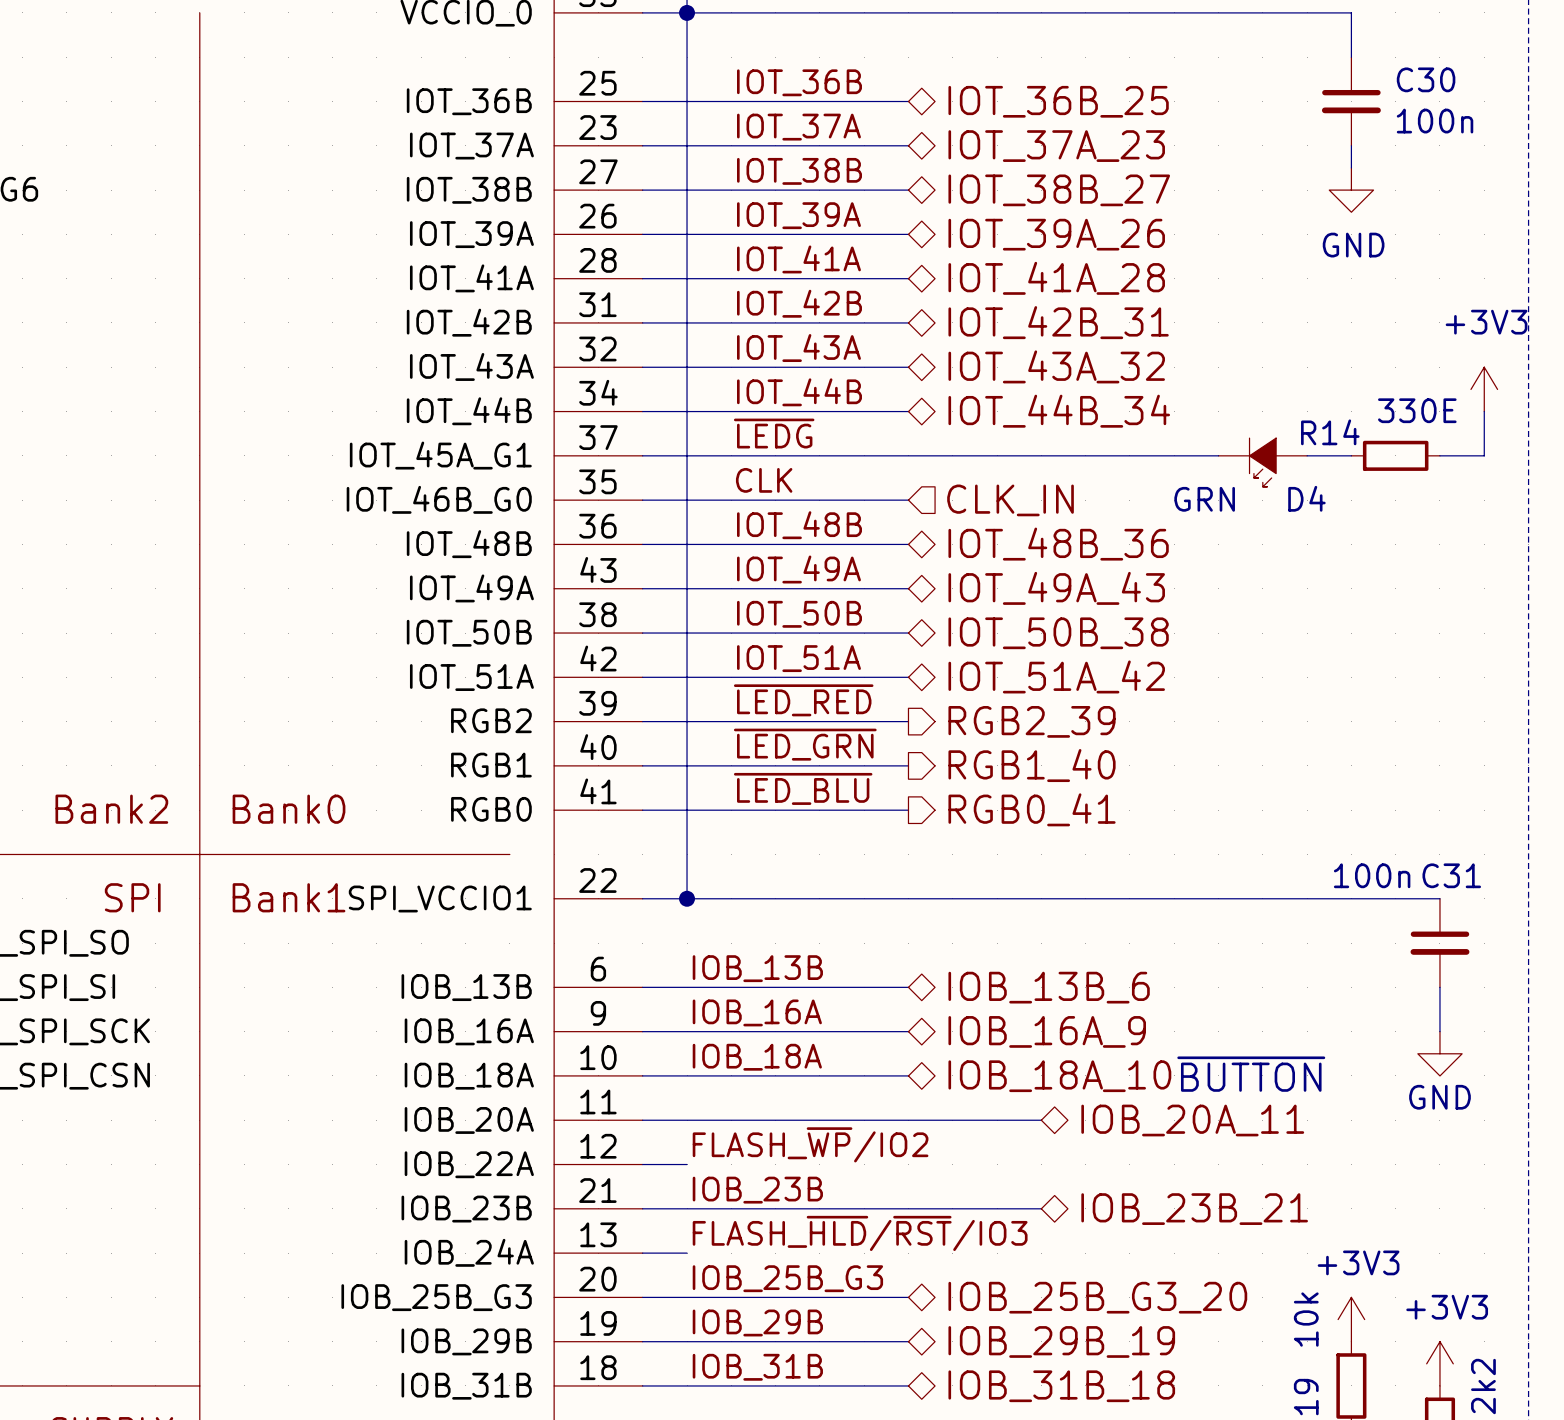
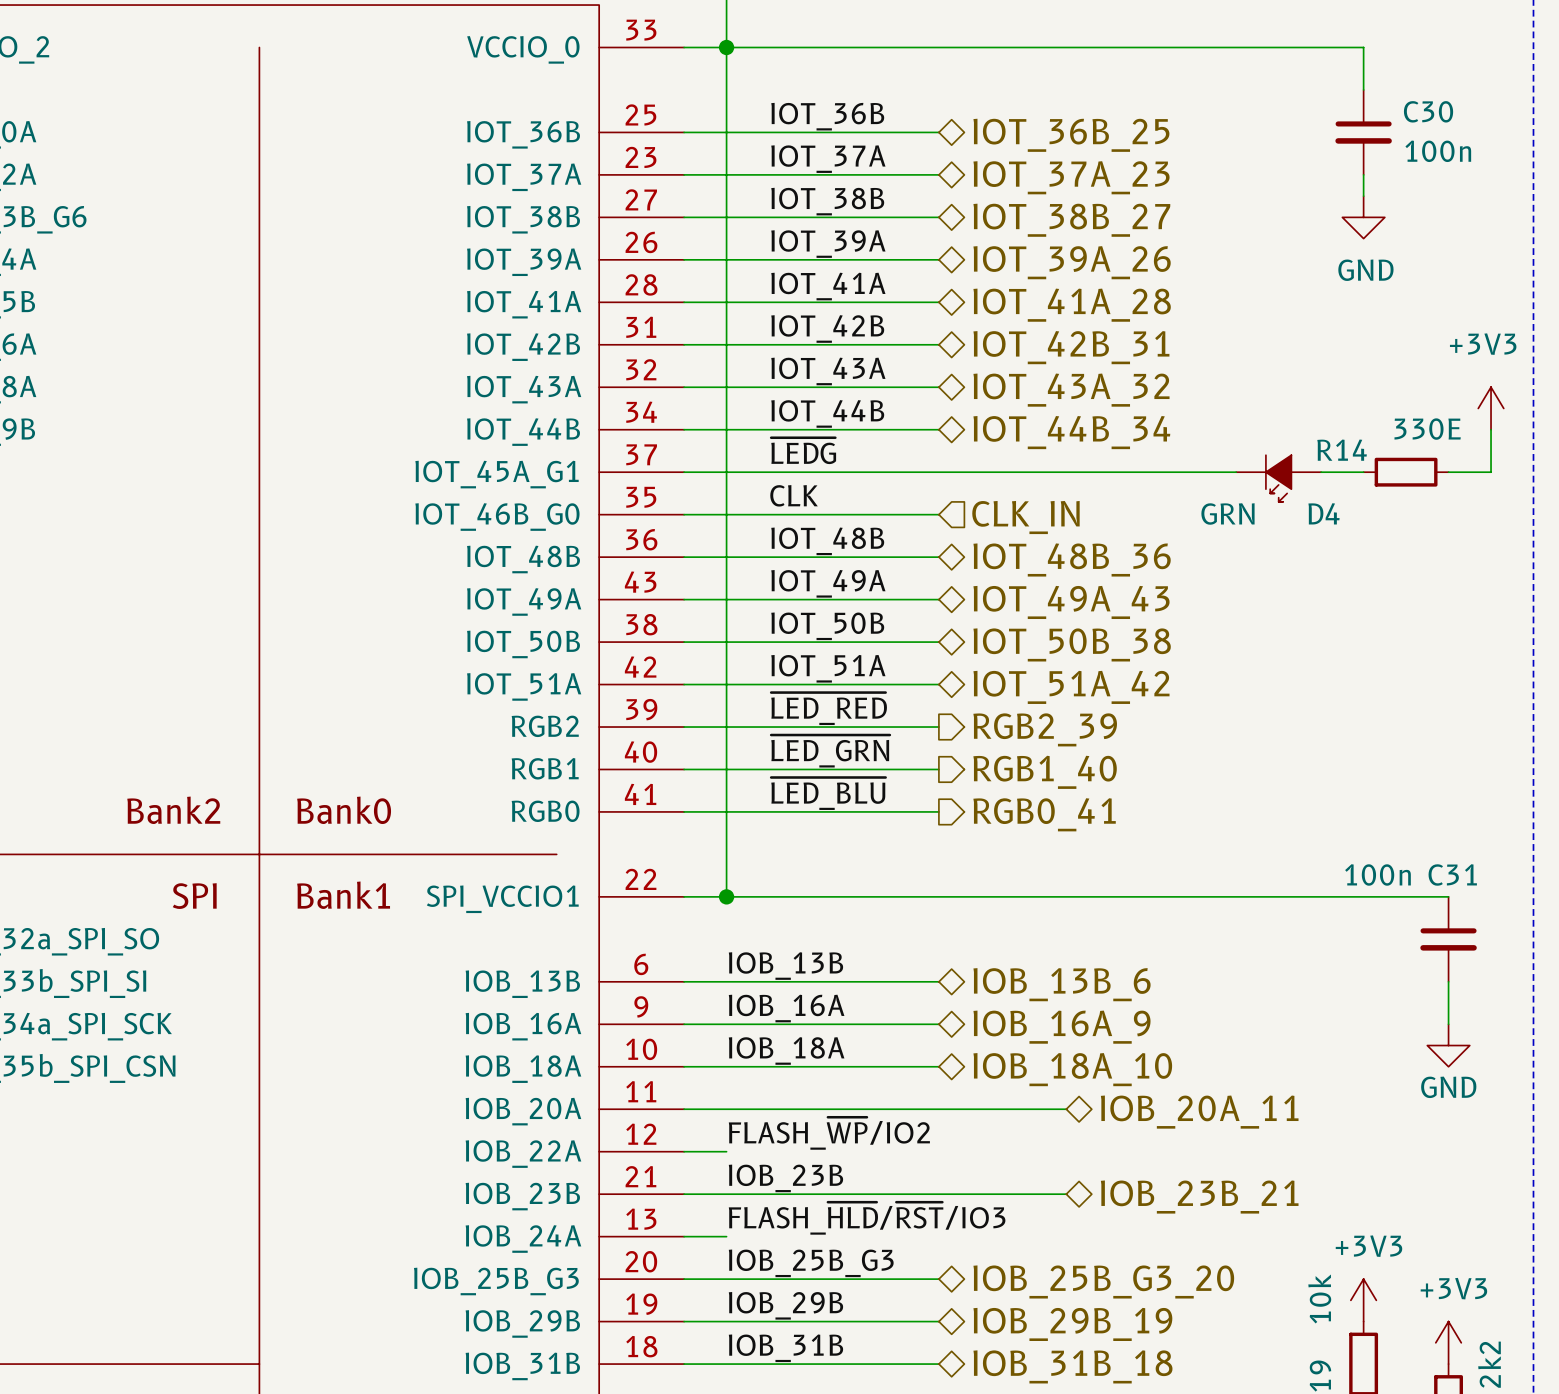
text: ~{BUTTON} (1251, 1074) -> none

